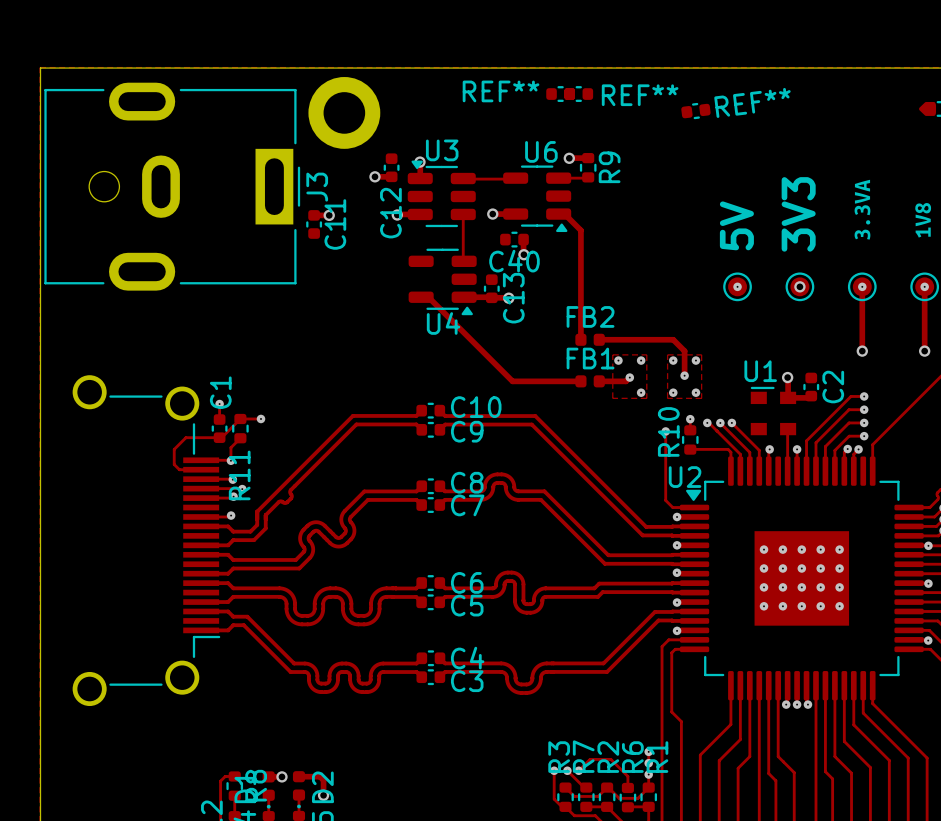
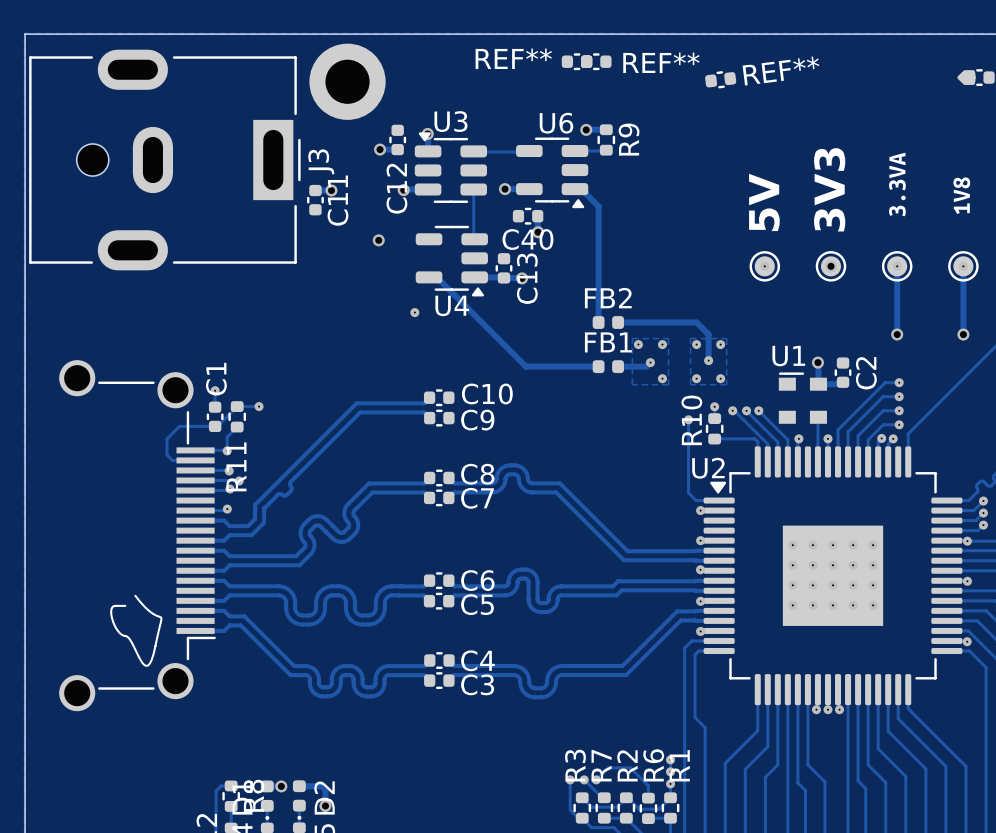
via: none -> (378, 240)
via: none -> (414, 312)
part footprint: [72, 375, 221, 707] -> [59, 360, 216, 712]
track: (439, 410) (445, 416) (535, 416) (646, 526) (694, 526) -> none
track: (439, 429) (445, 424) (531, 424) (642, 535) (694, 535) -> none

